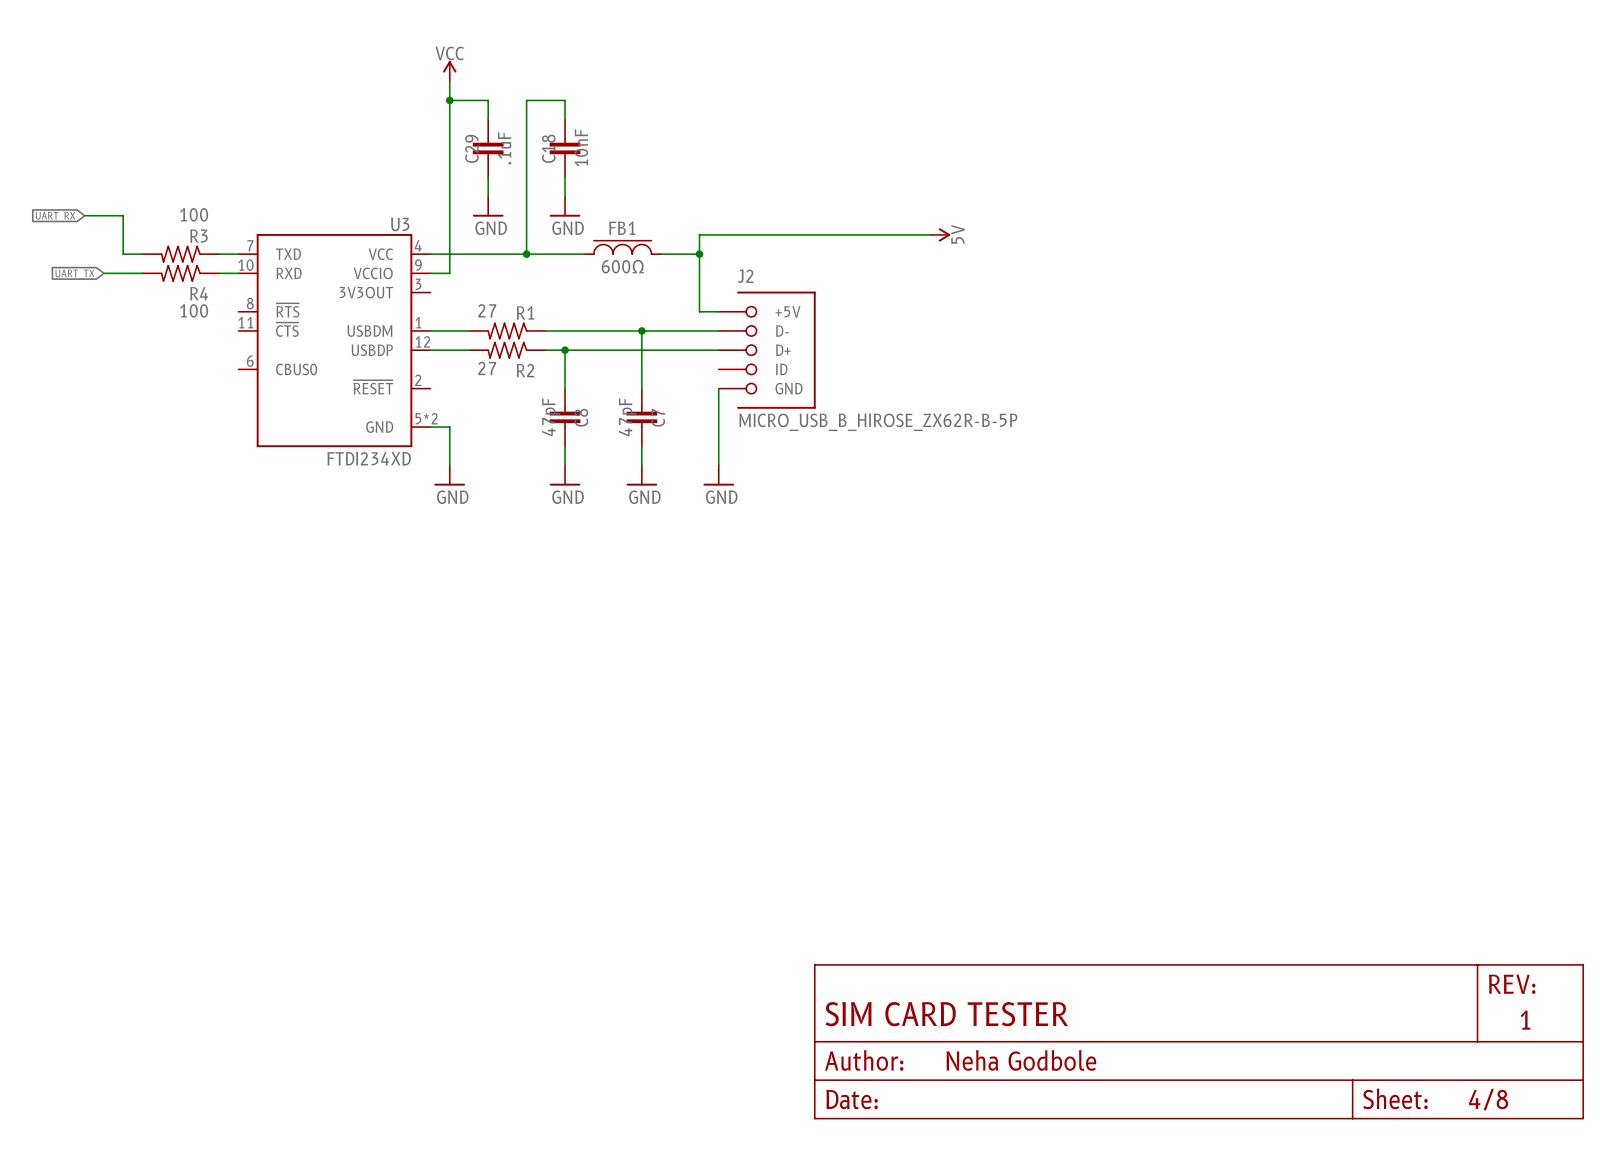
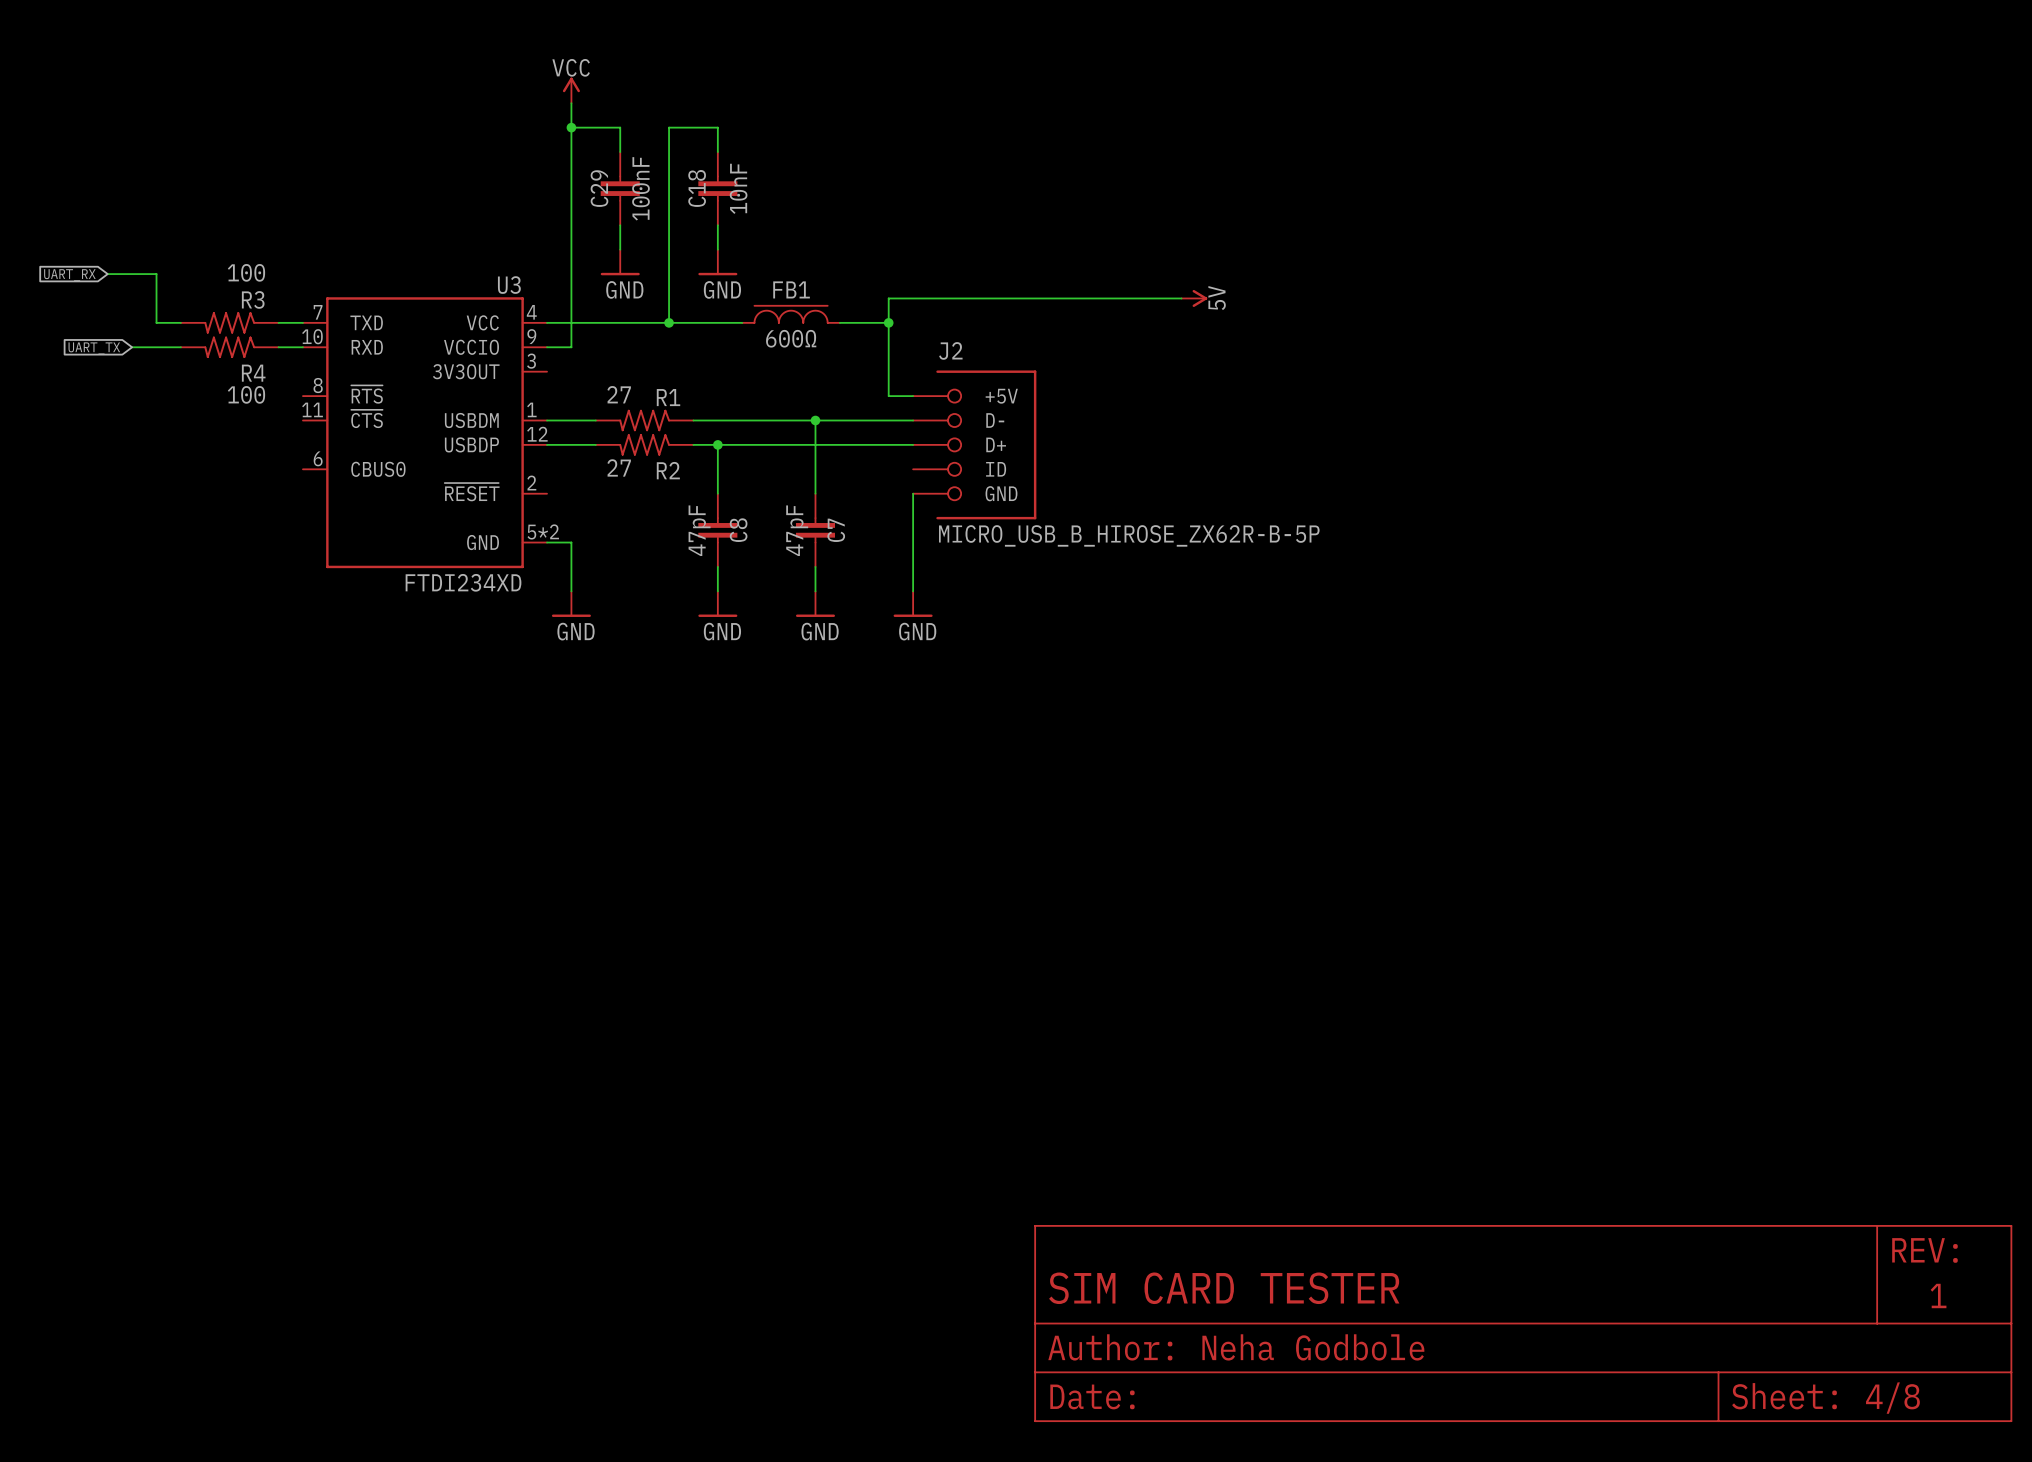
C29 value: .1uF (504, 148) -> 100nF (640, 188)

